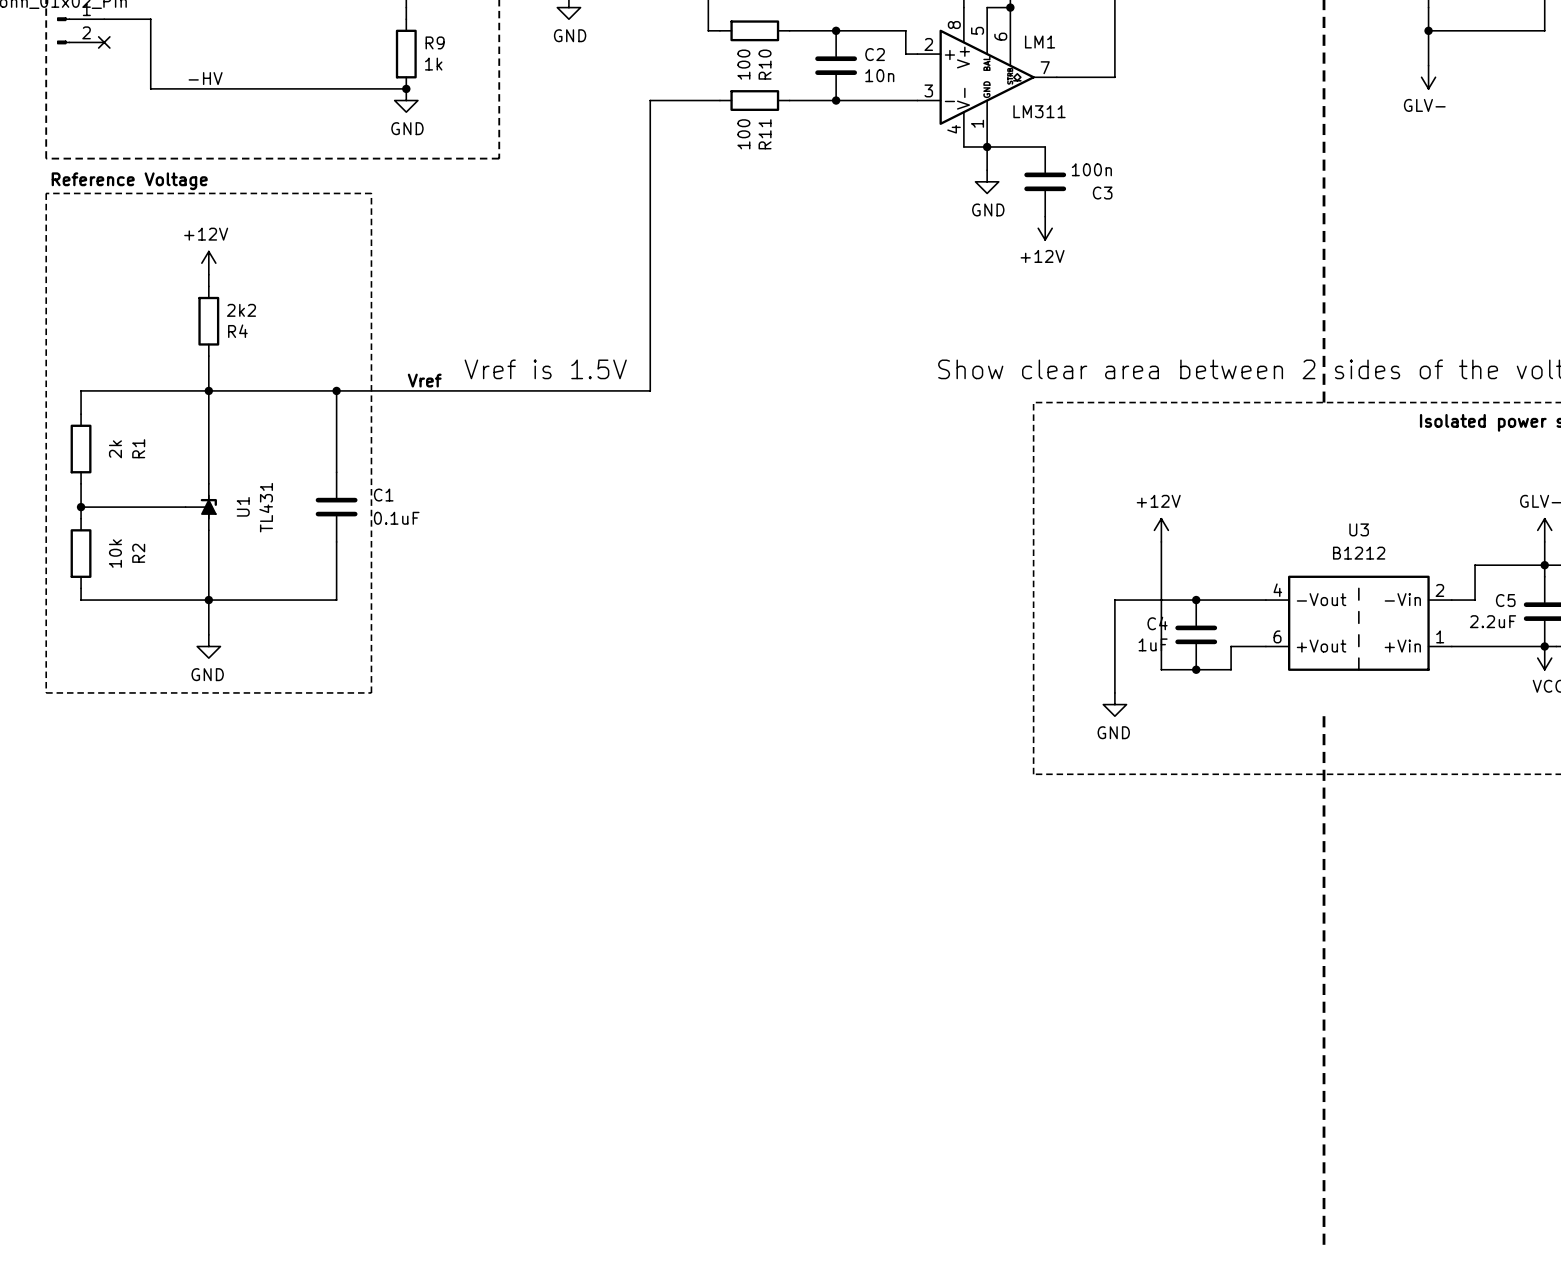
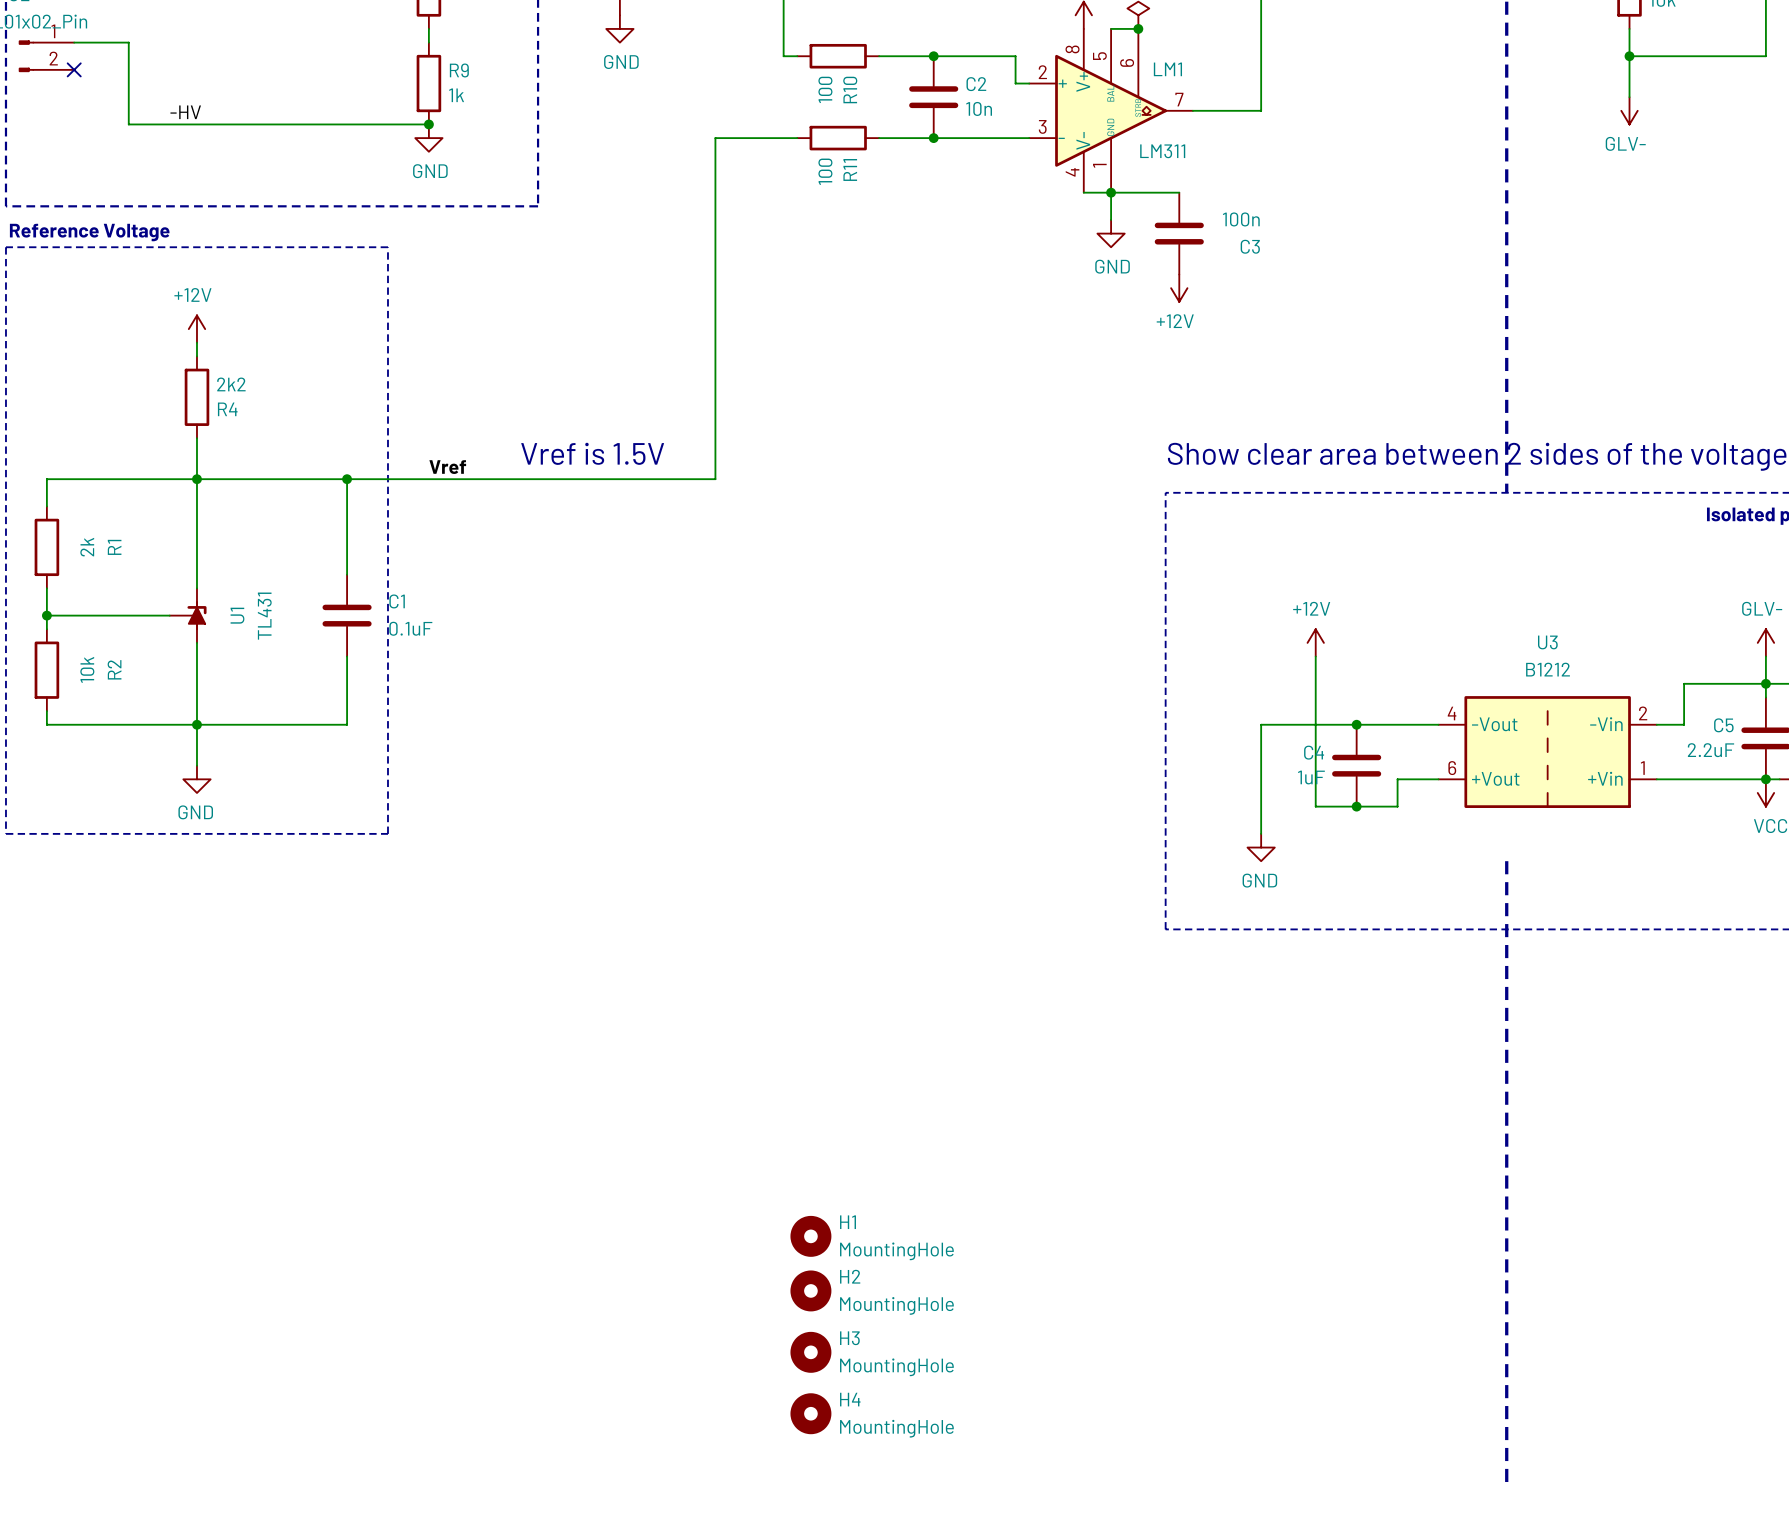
H1: none -> MountingHole (810, 1236)
H2: none -> MountingHole (810, 1290)
H3: none -> MountingHole (810, 1352)
H4: none -> MountingHole (810, 1413)

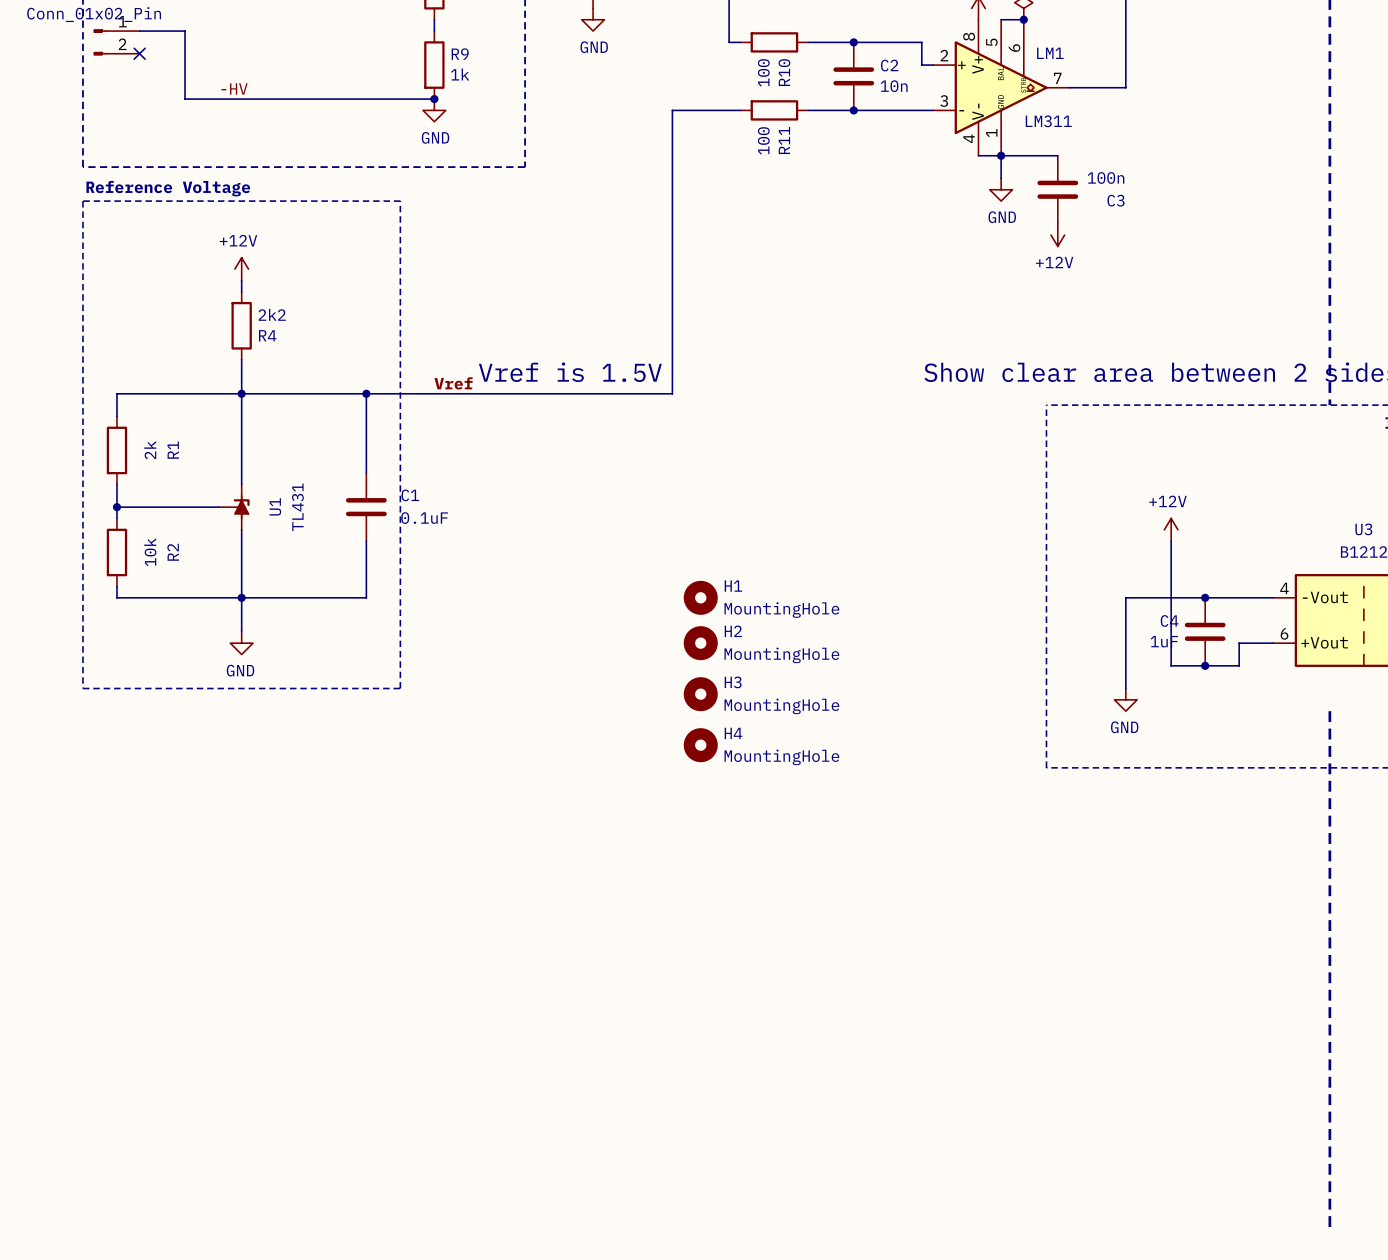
H1 position: (810, 1236) -> (700, 597)
H2 position: (810, 1290) -> (700, 643)
H3 position: (810, 1352) -> (700, 694)
H4 position: (810, 1413) -> (700, 745)

